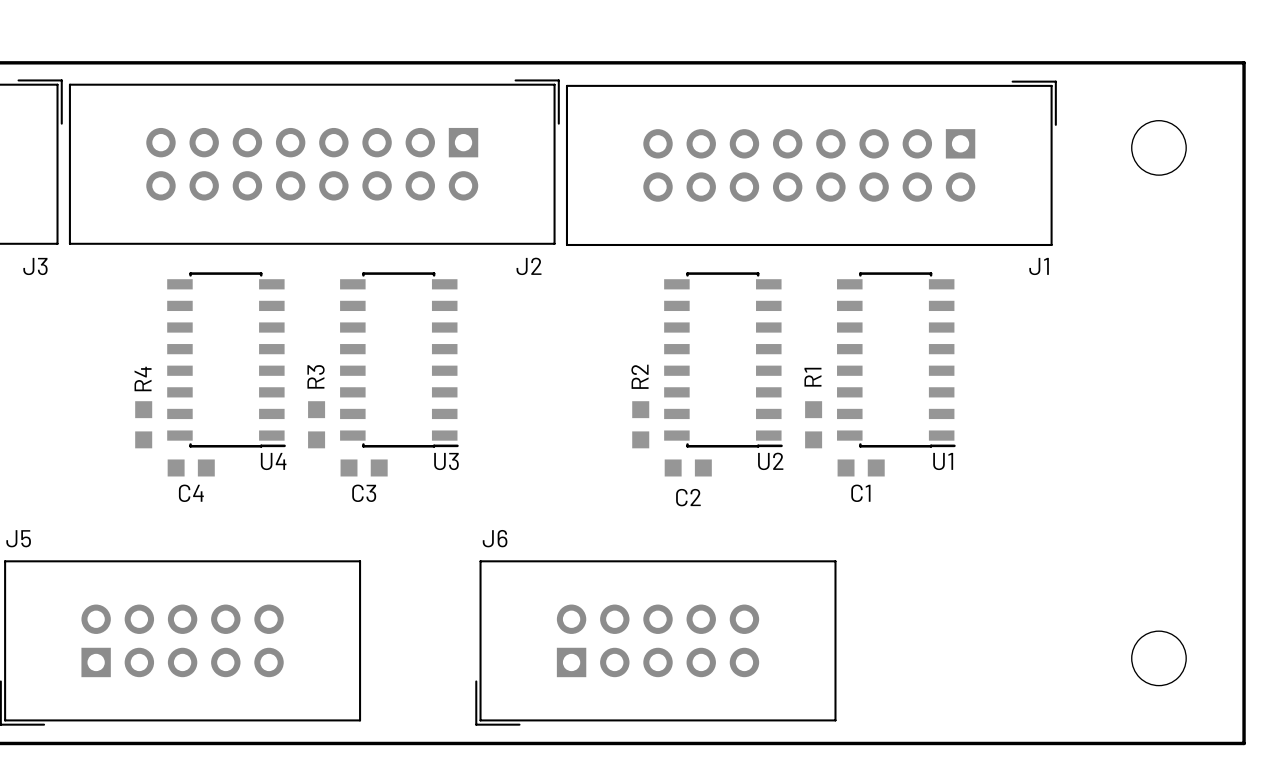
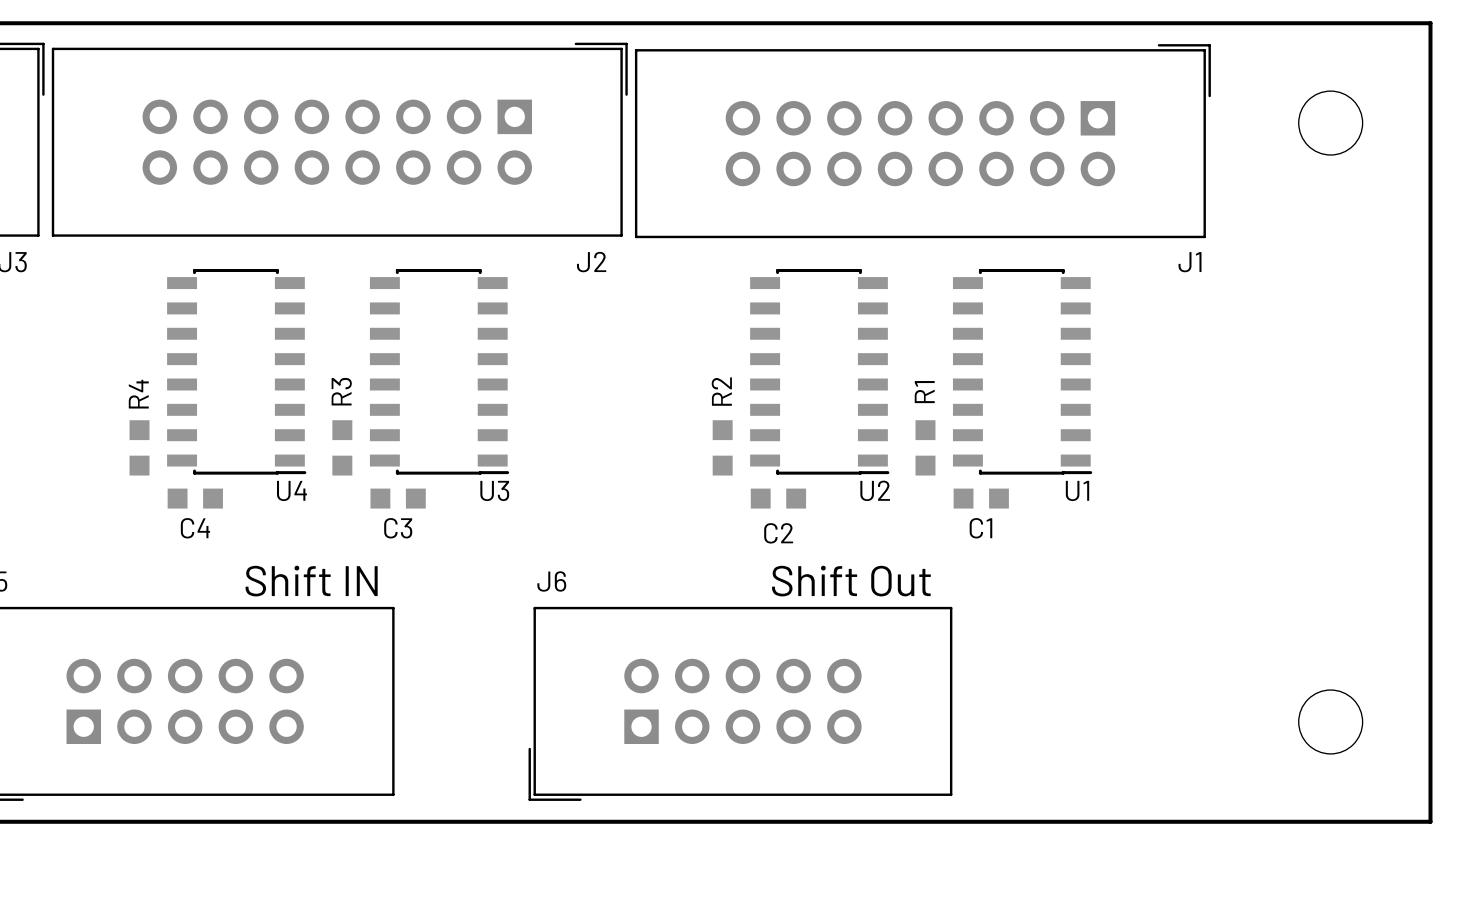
text: none -> Shift IN (311, 581)
text: none -> Shift Out (851, 581)

